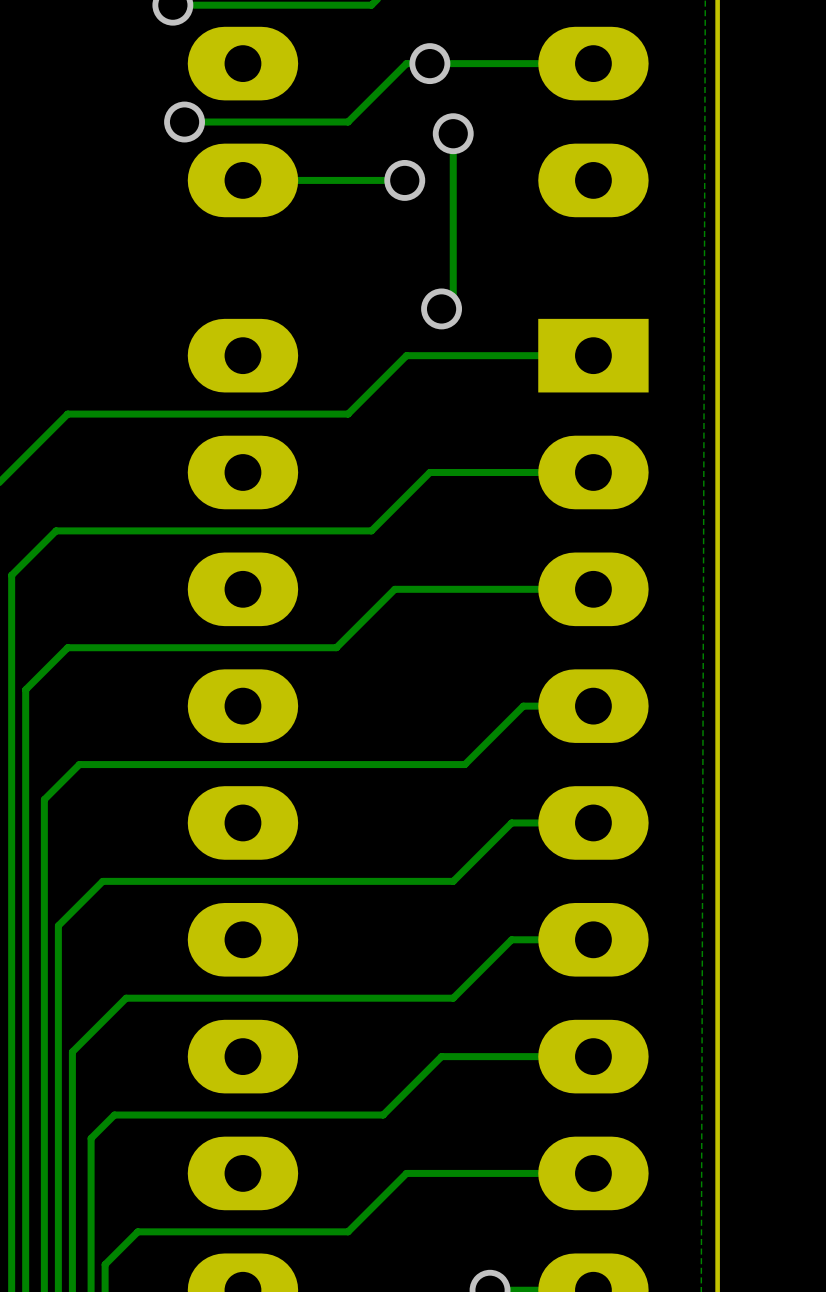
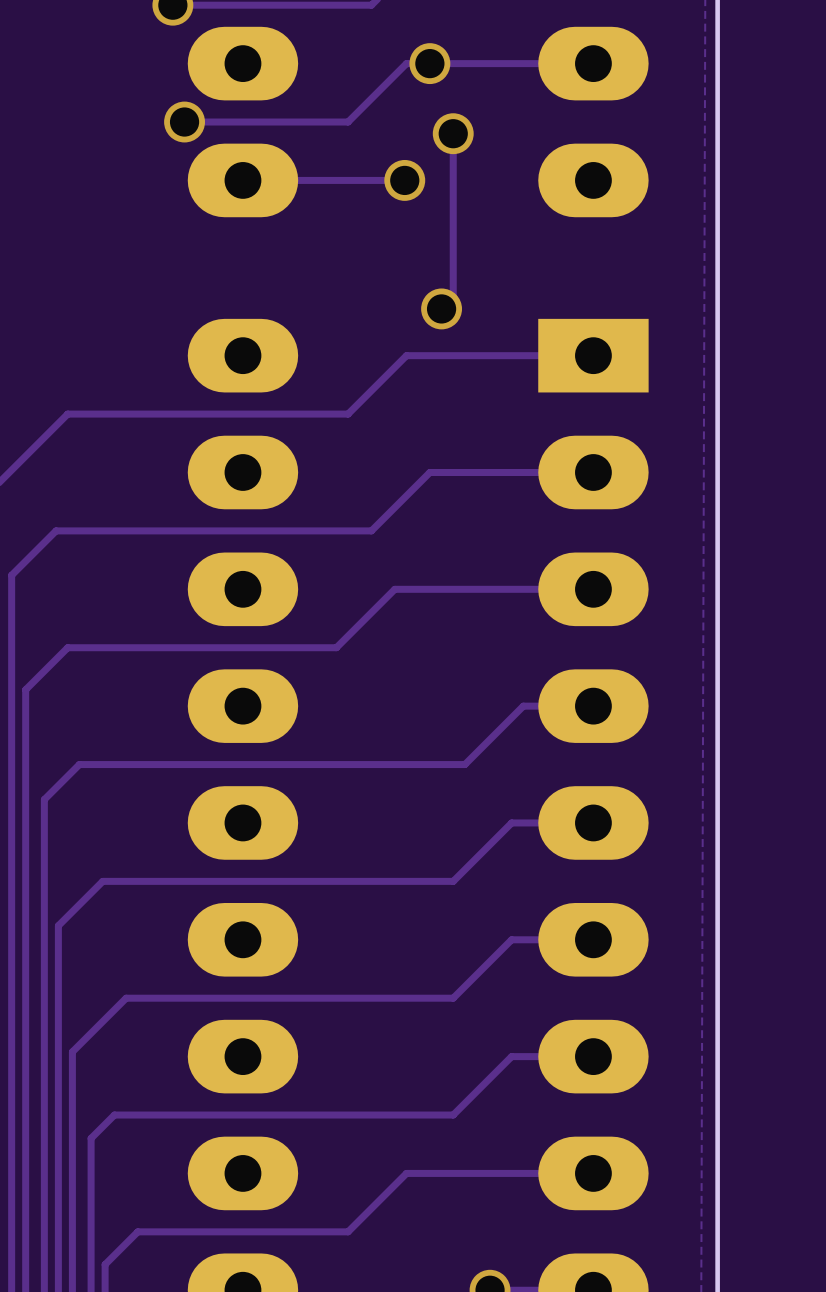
track: (511, 1056) (441, 1056) (383, 1115) -> (511, 1056) (453, 1115) (383, 1115)

